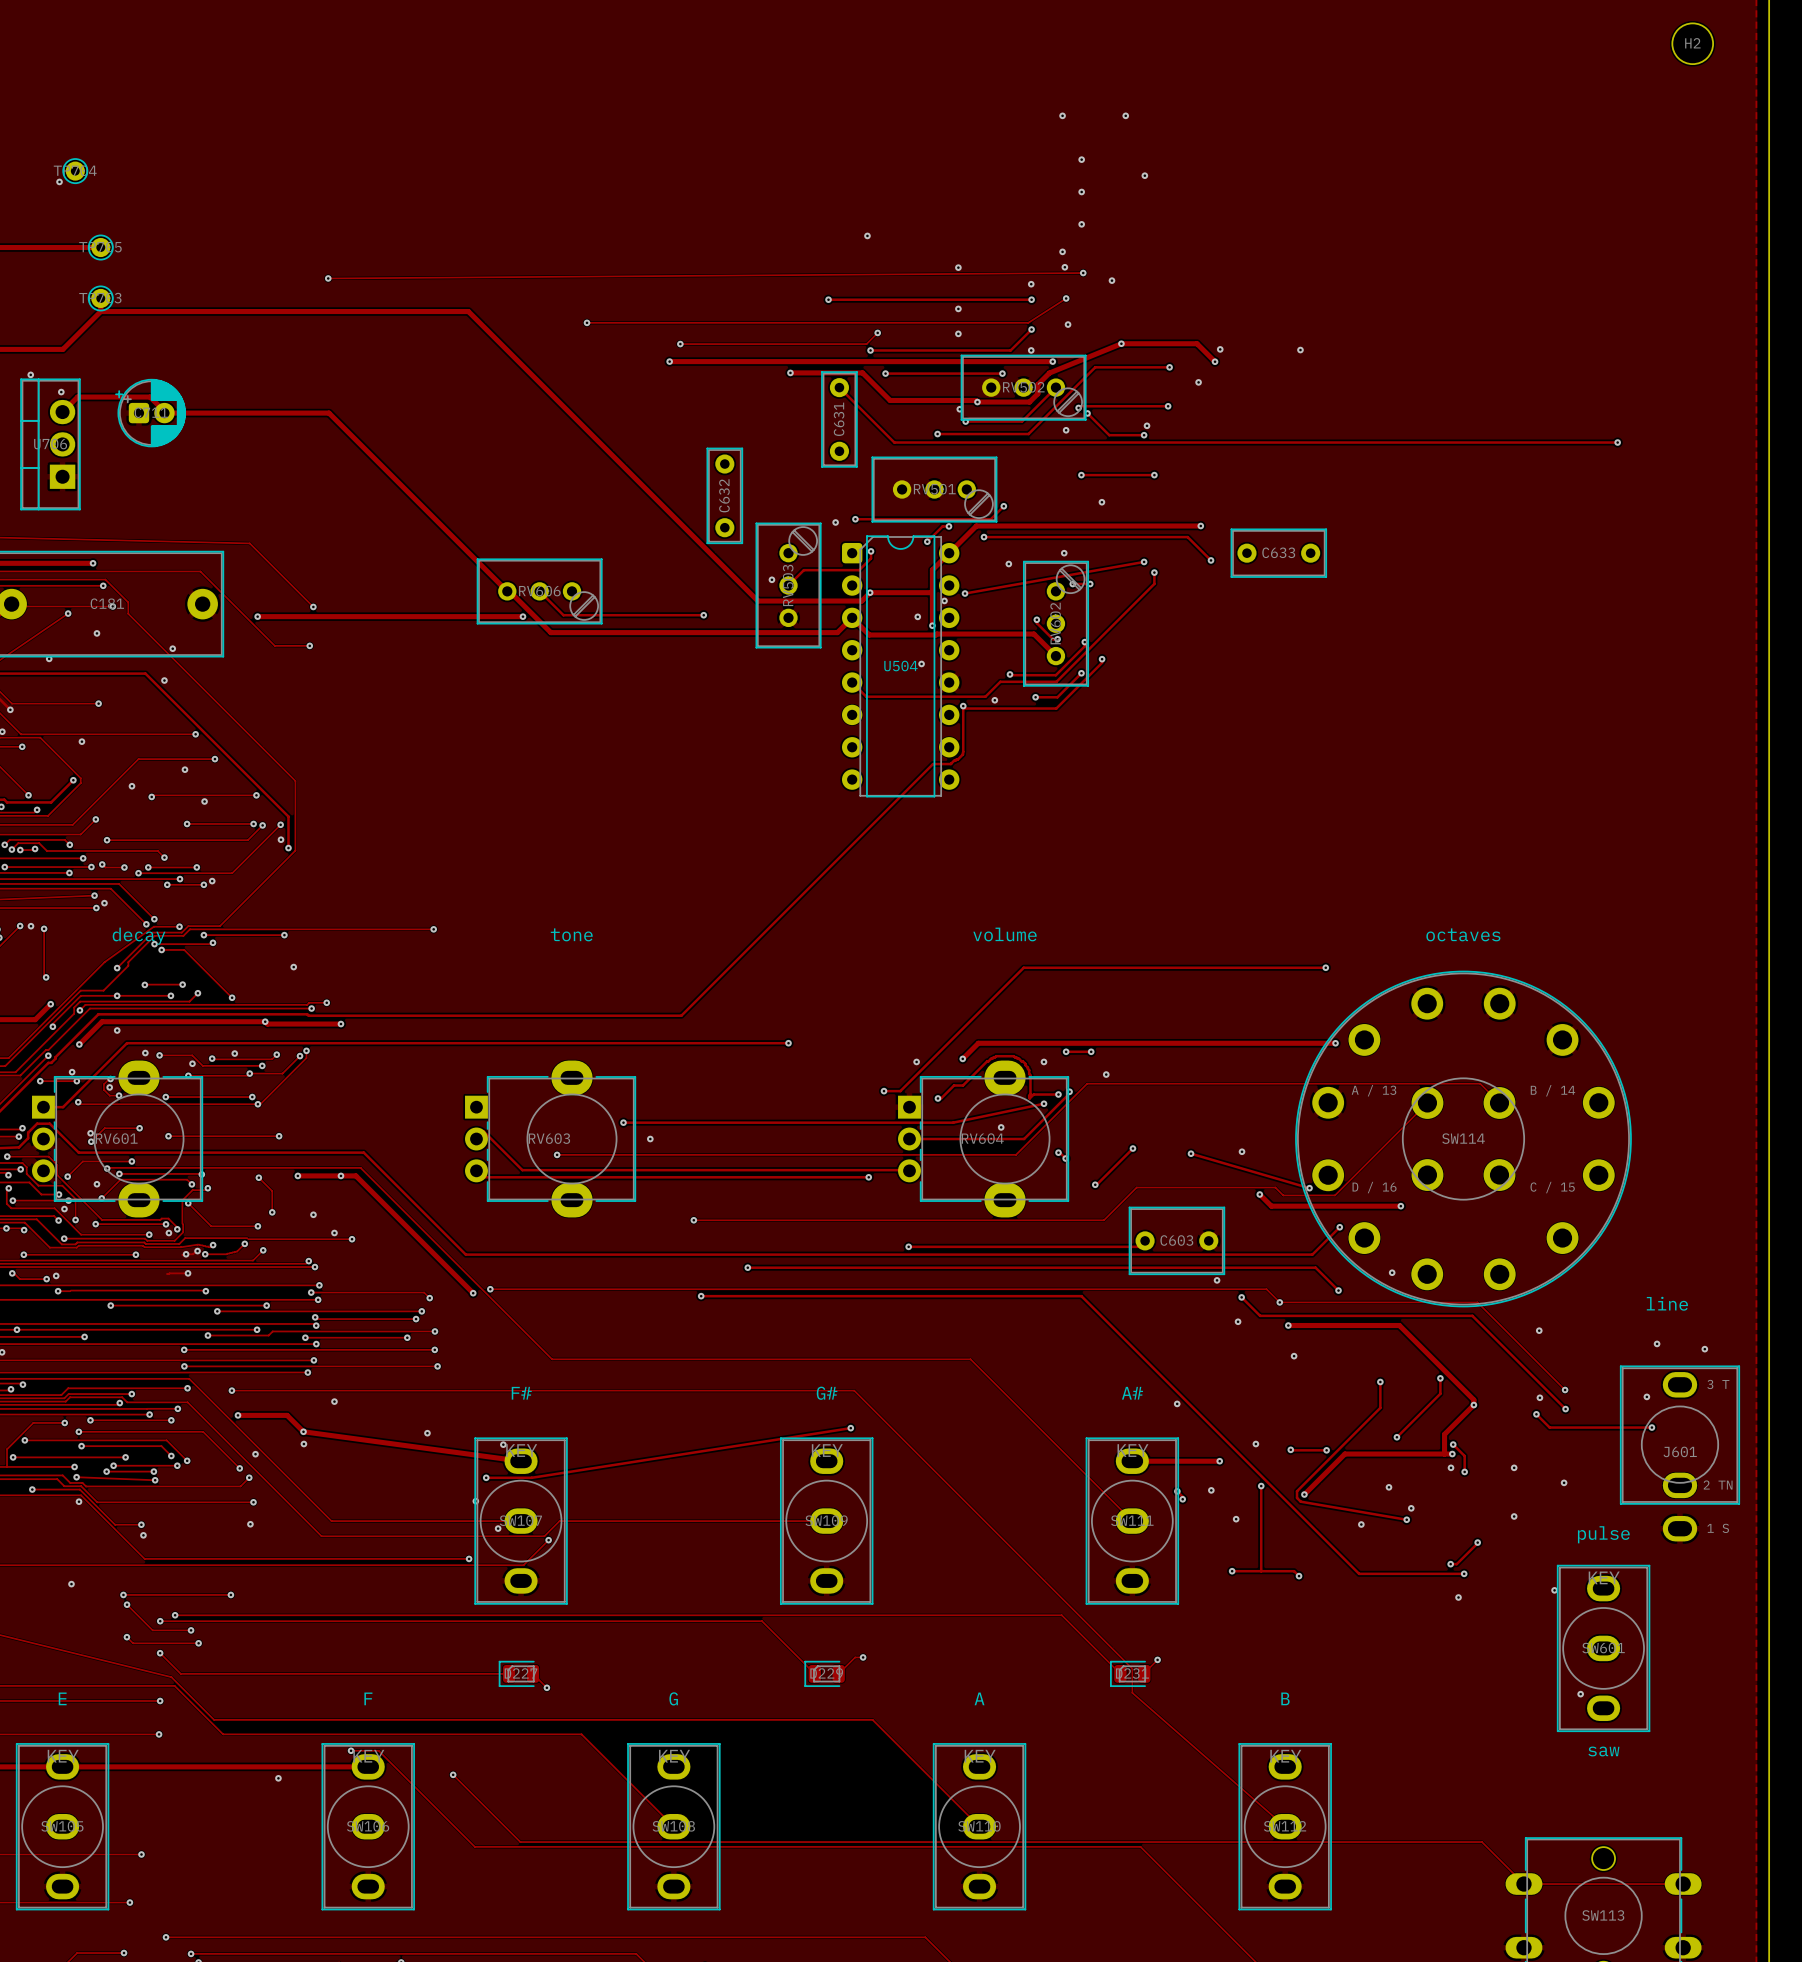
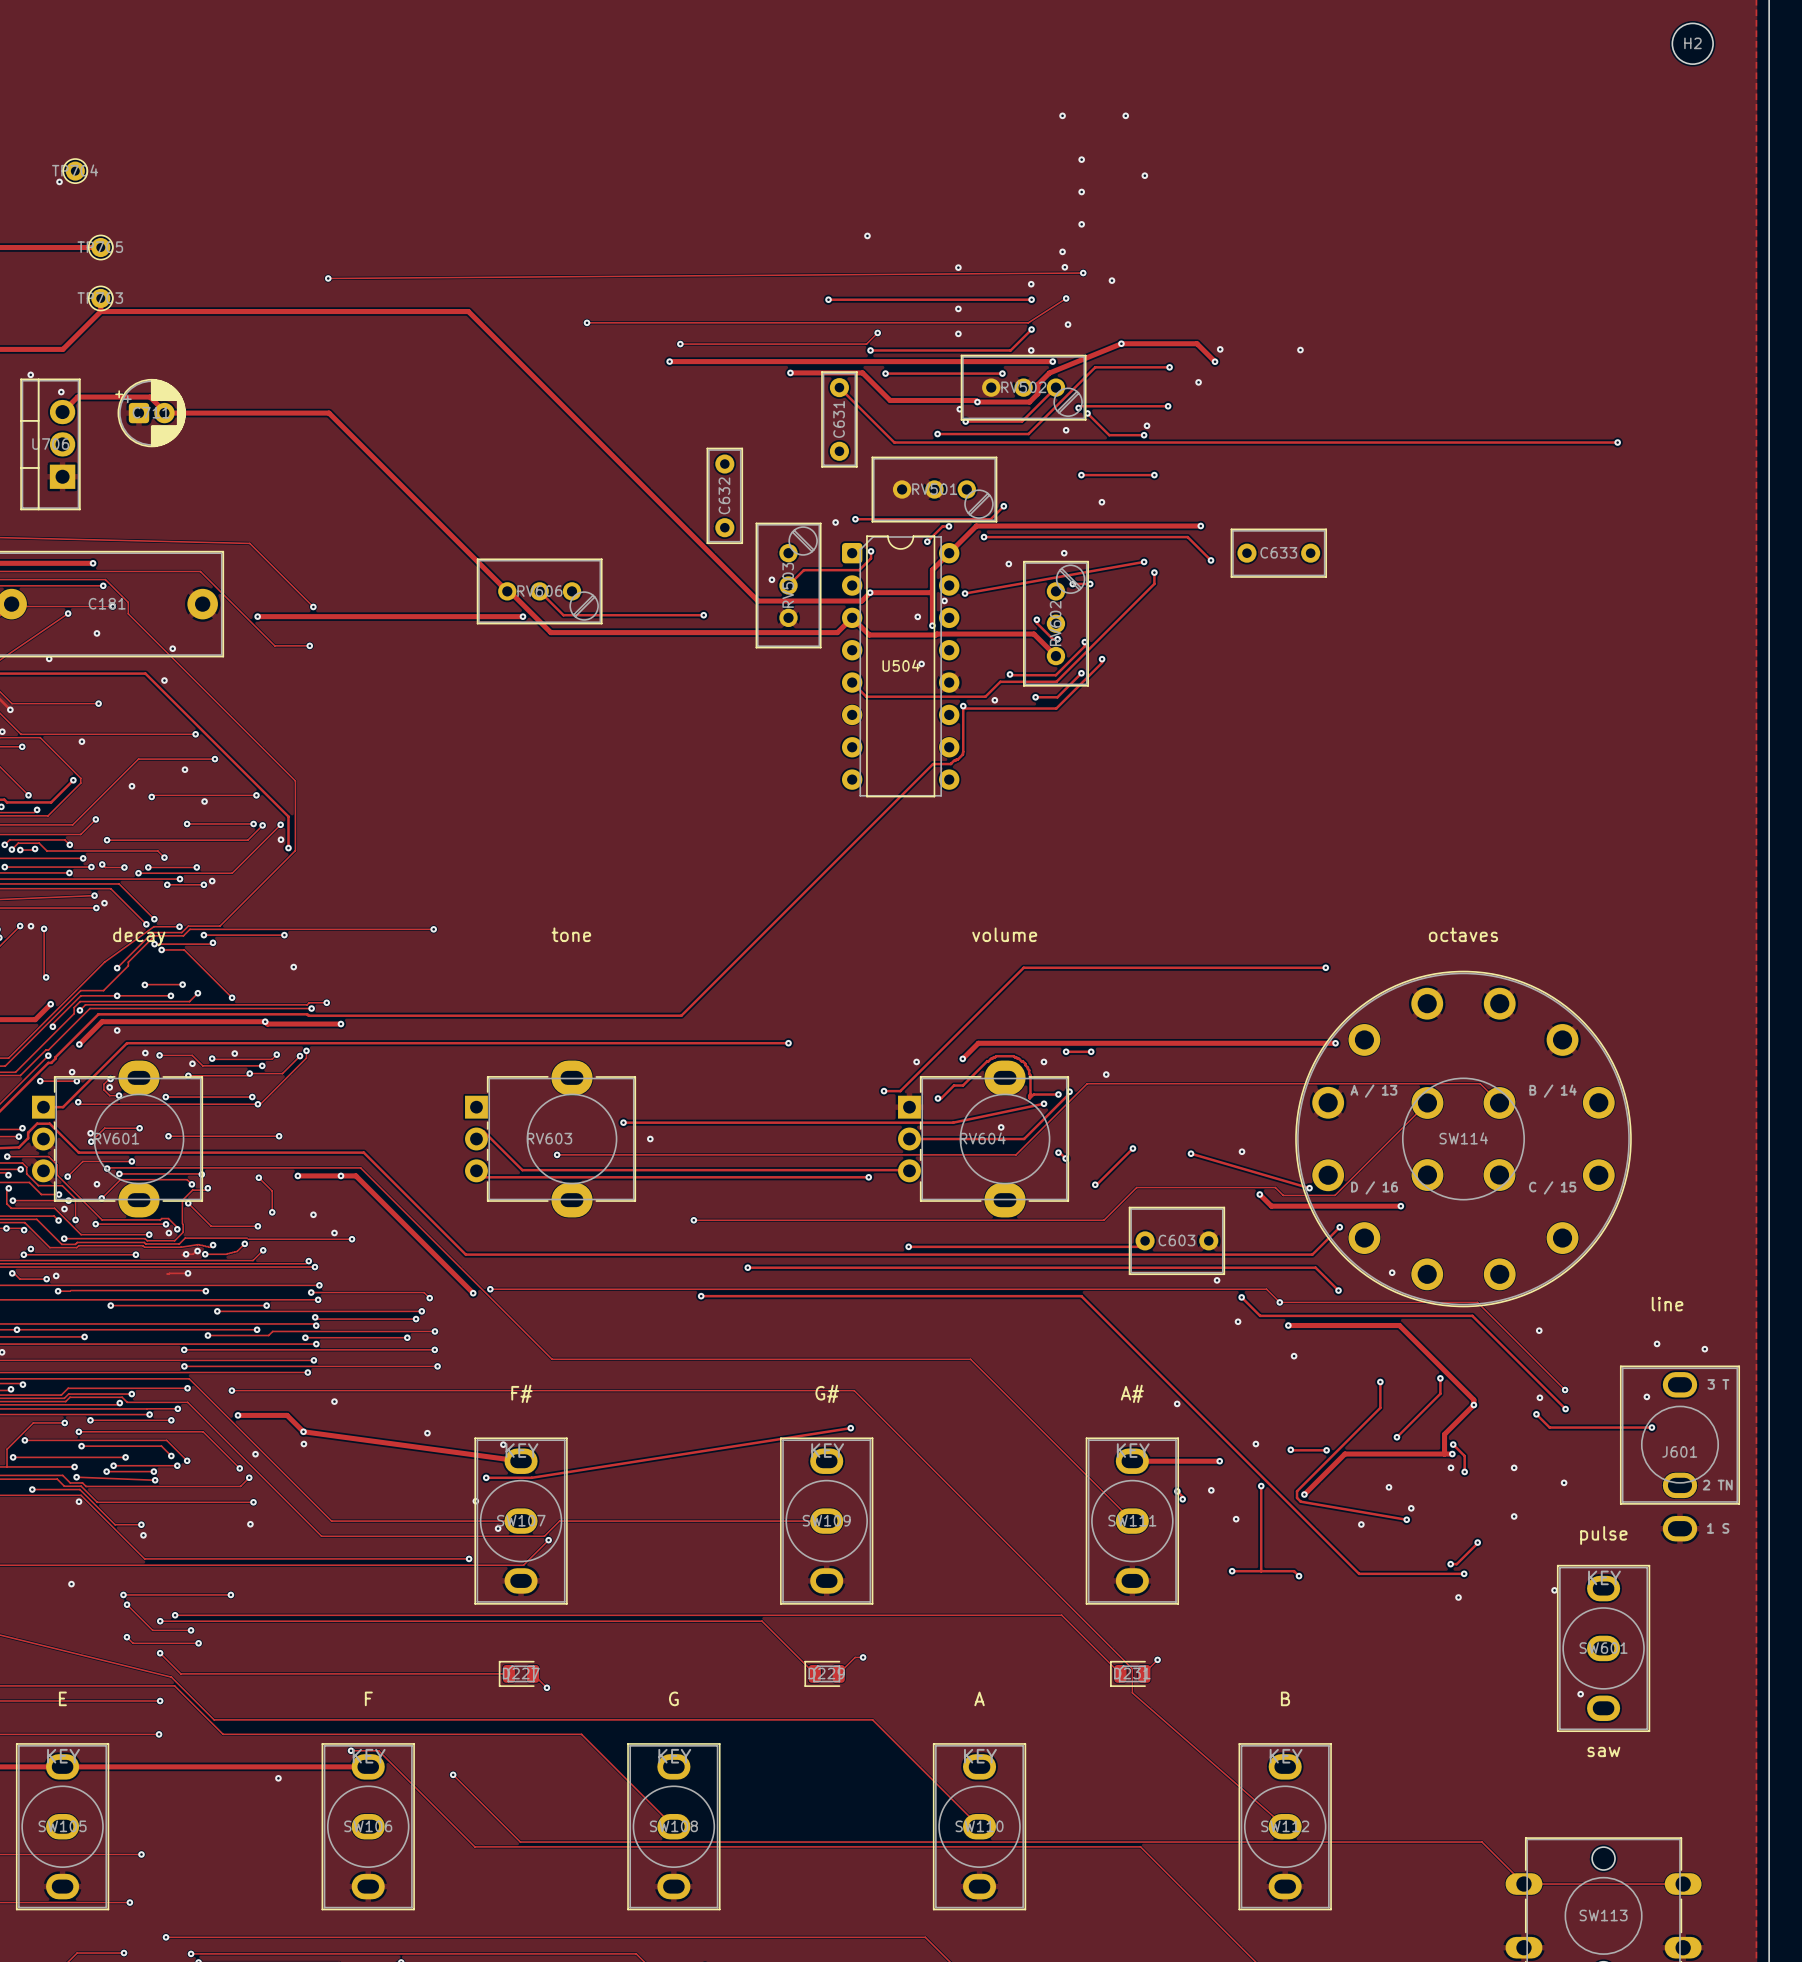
via: none -> (30, 1248)

